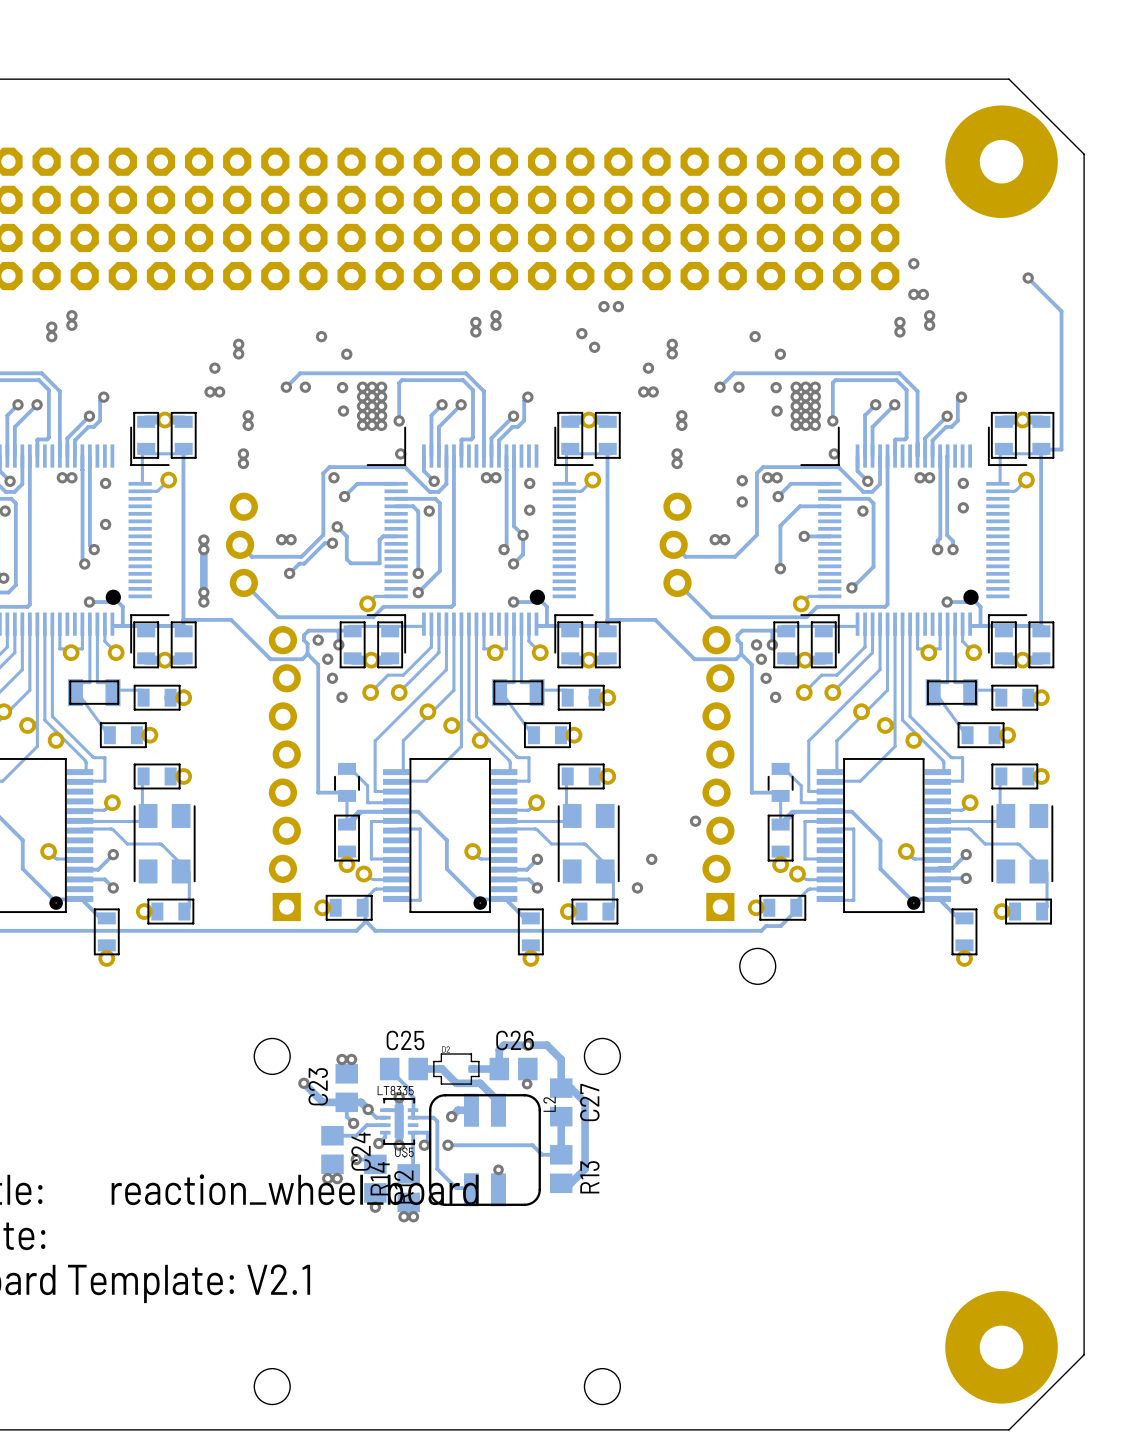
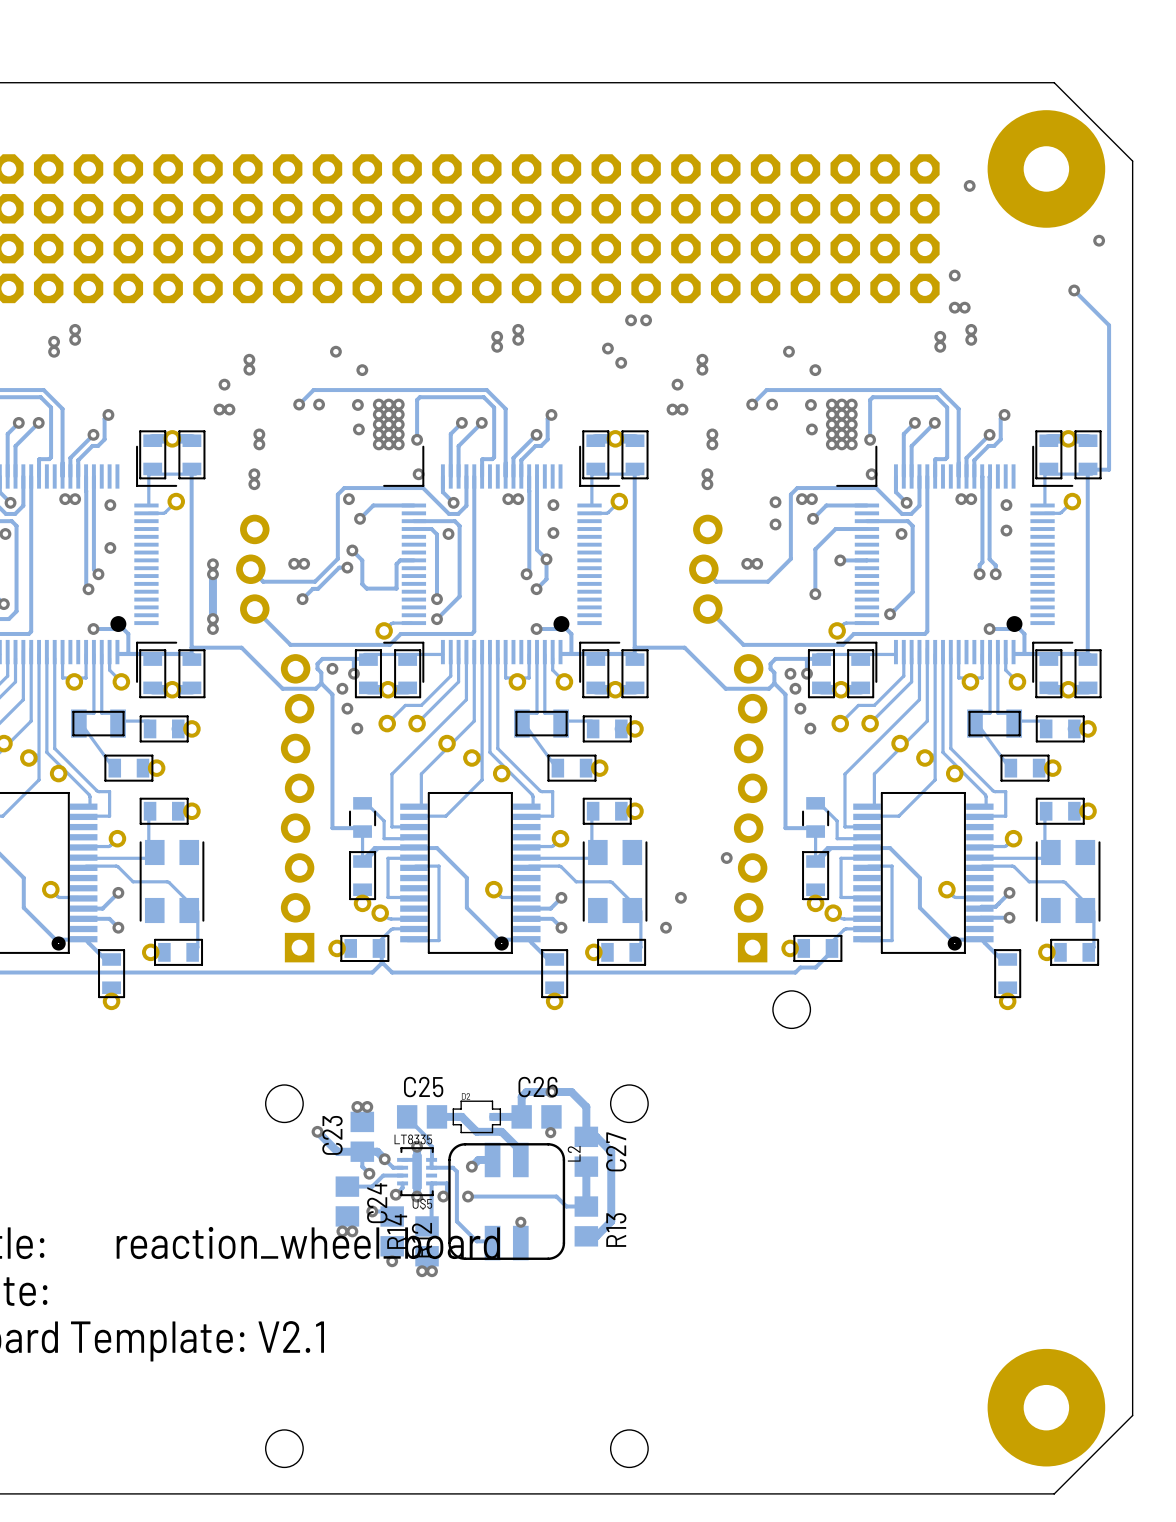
via: none -> (969, 185)
via: none -> (1099, 240)

